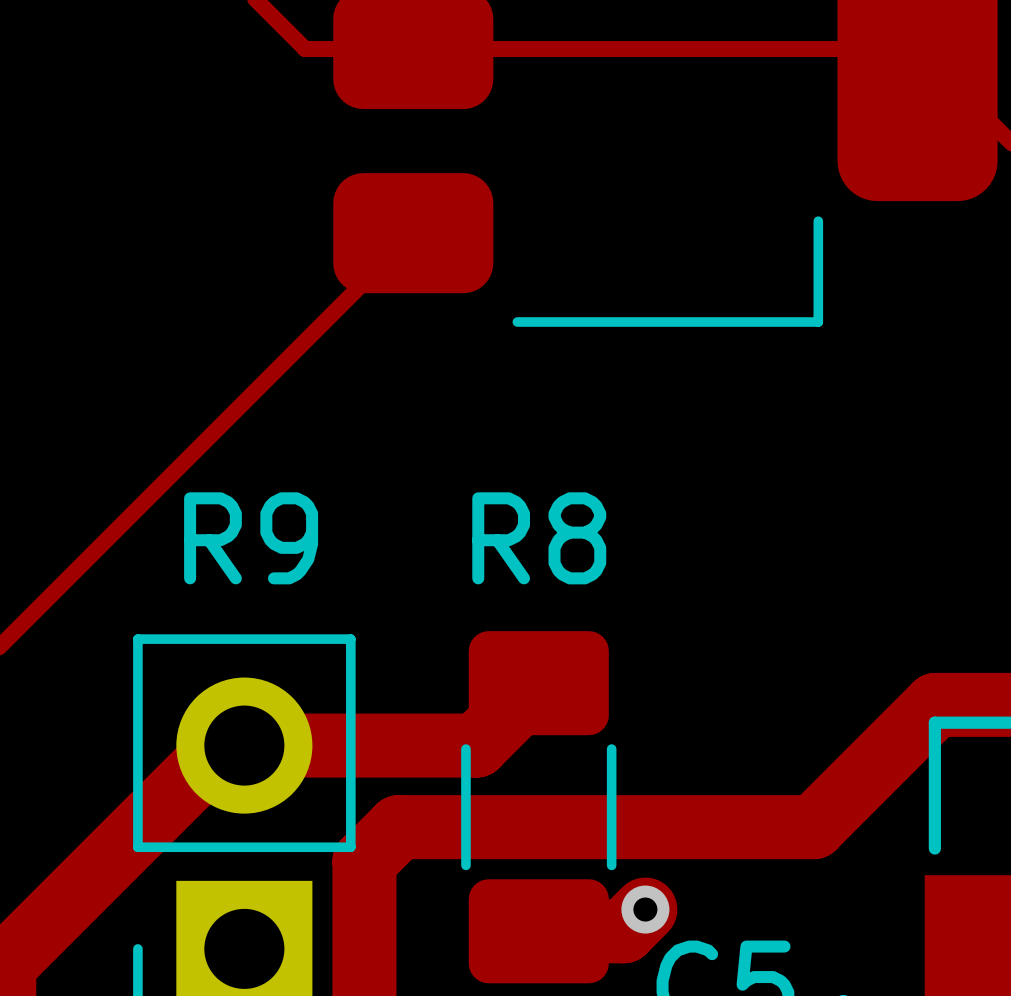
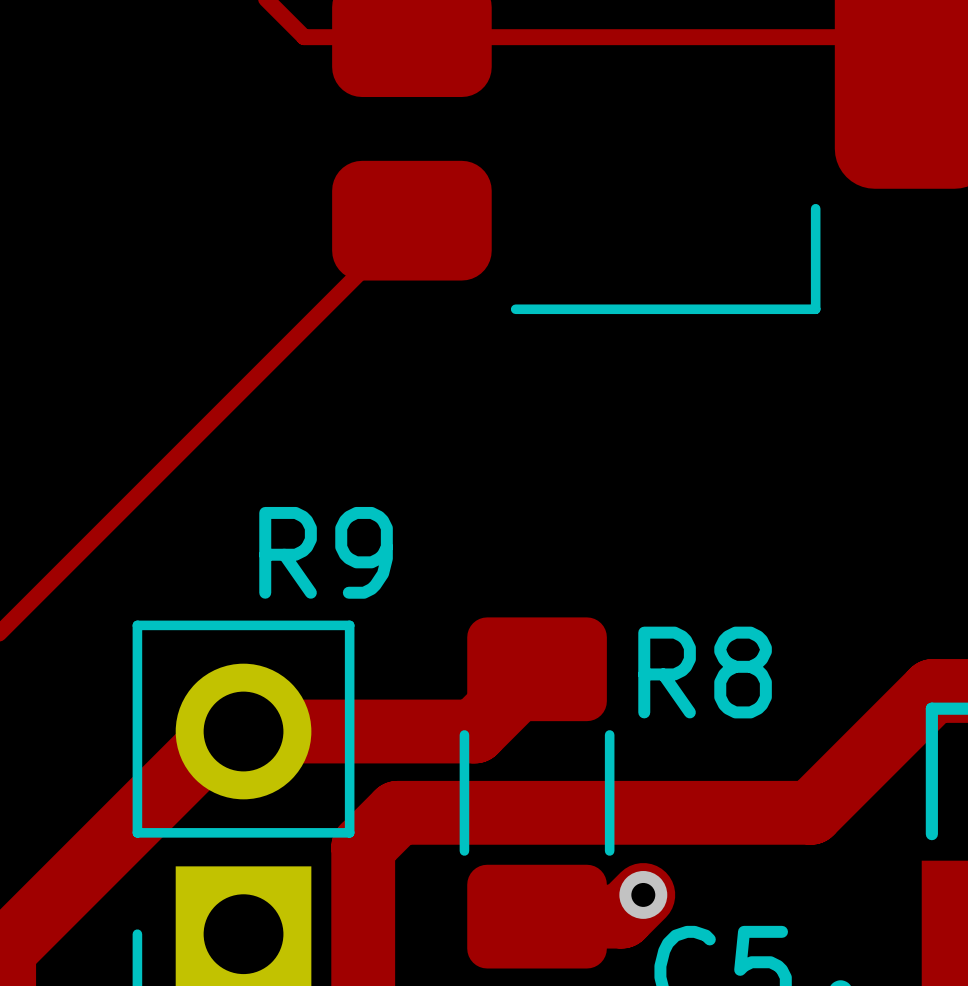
R9 name position: R9 (251, 538) -> R9 (326, 552)
R8 name position: R8 (539, 538) -> R8 (705, 672)

